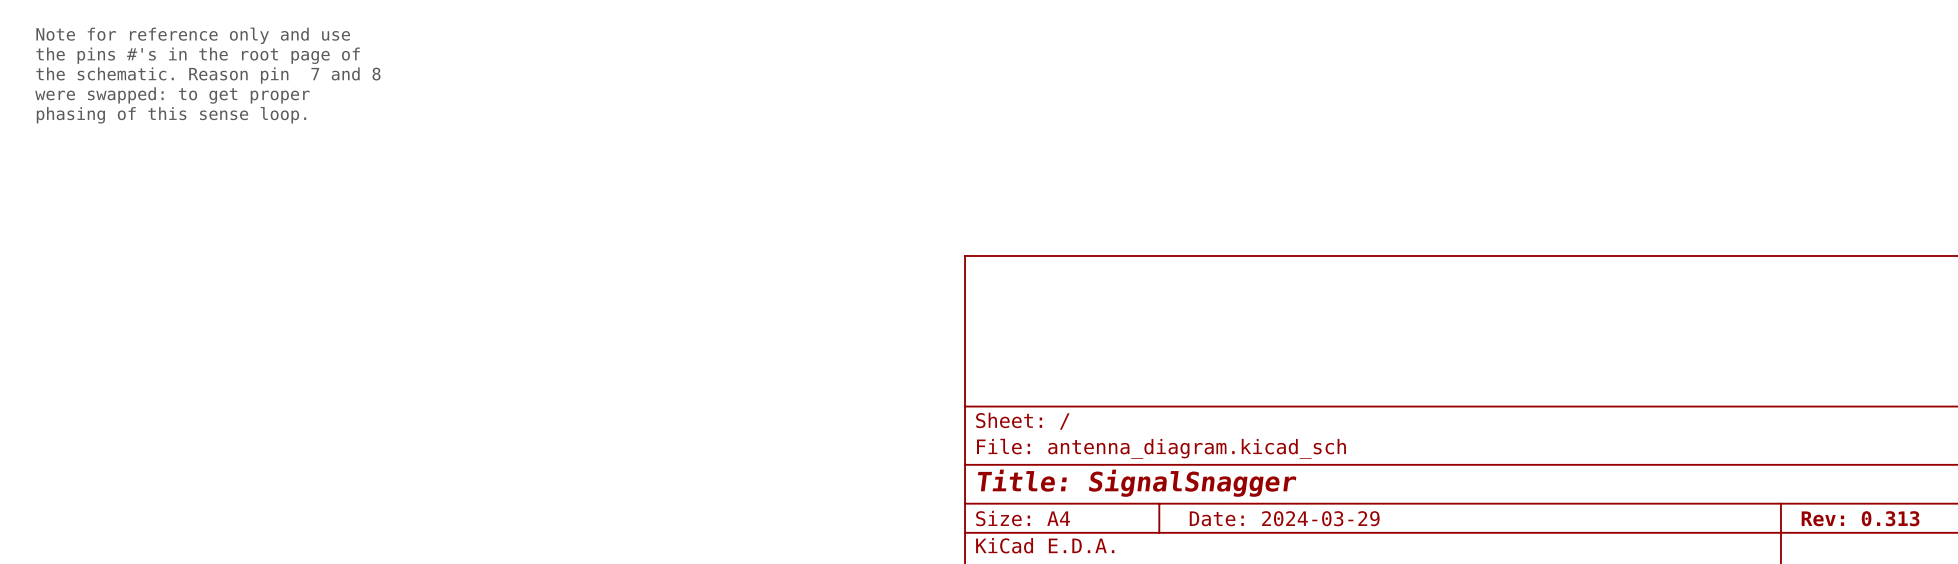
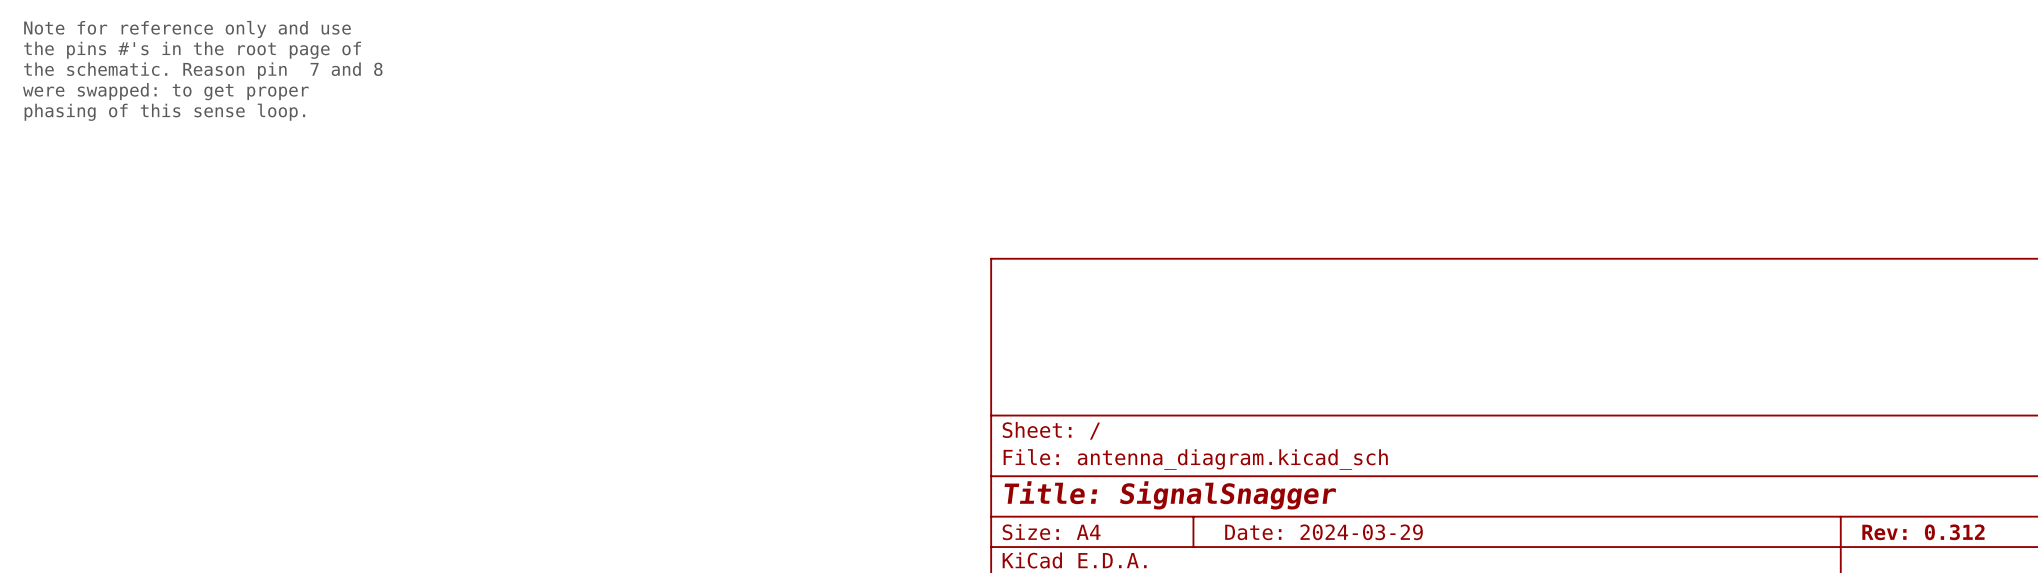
title block: Rev: 0.313 (1860, 518) -> Rev: 0.312 (1923, 532)

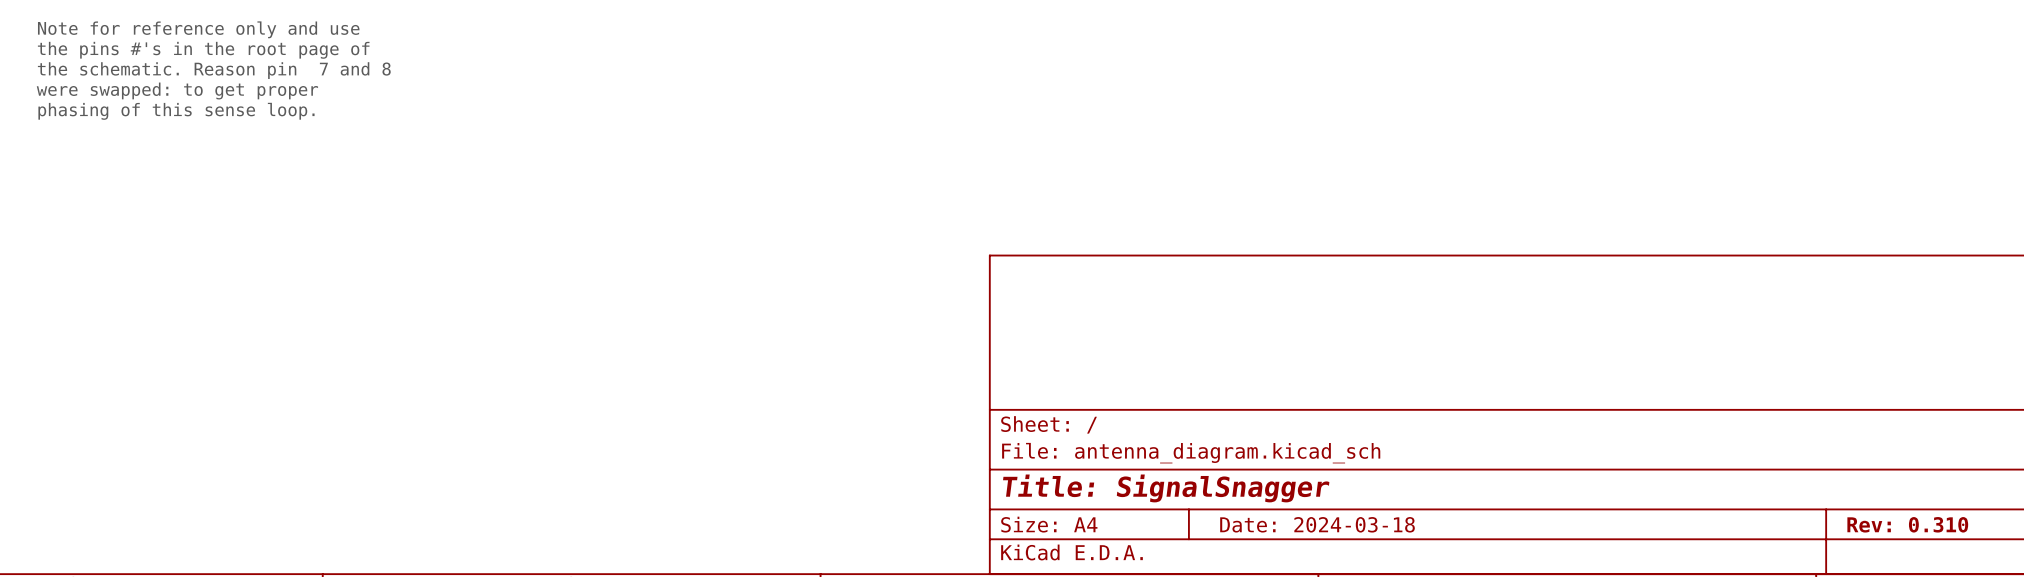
title block: Date: 2024-03-29 (1324, 532) -> Date: 2024-03-18 (1317, 524)
title block: Rev: 0.312 (1923, 532) -> Rev: 0.310 (1907, 524)

